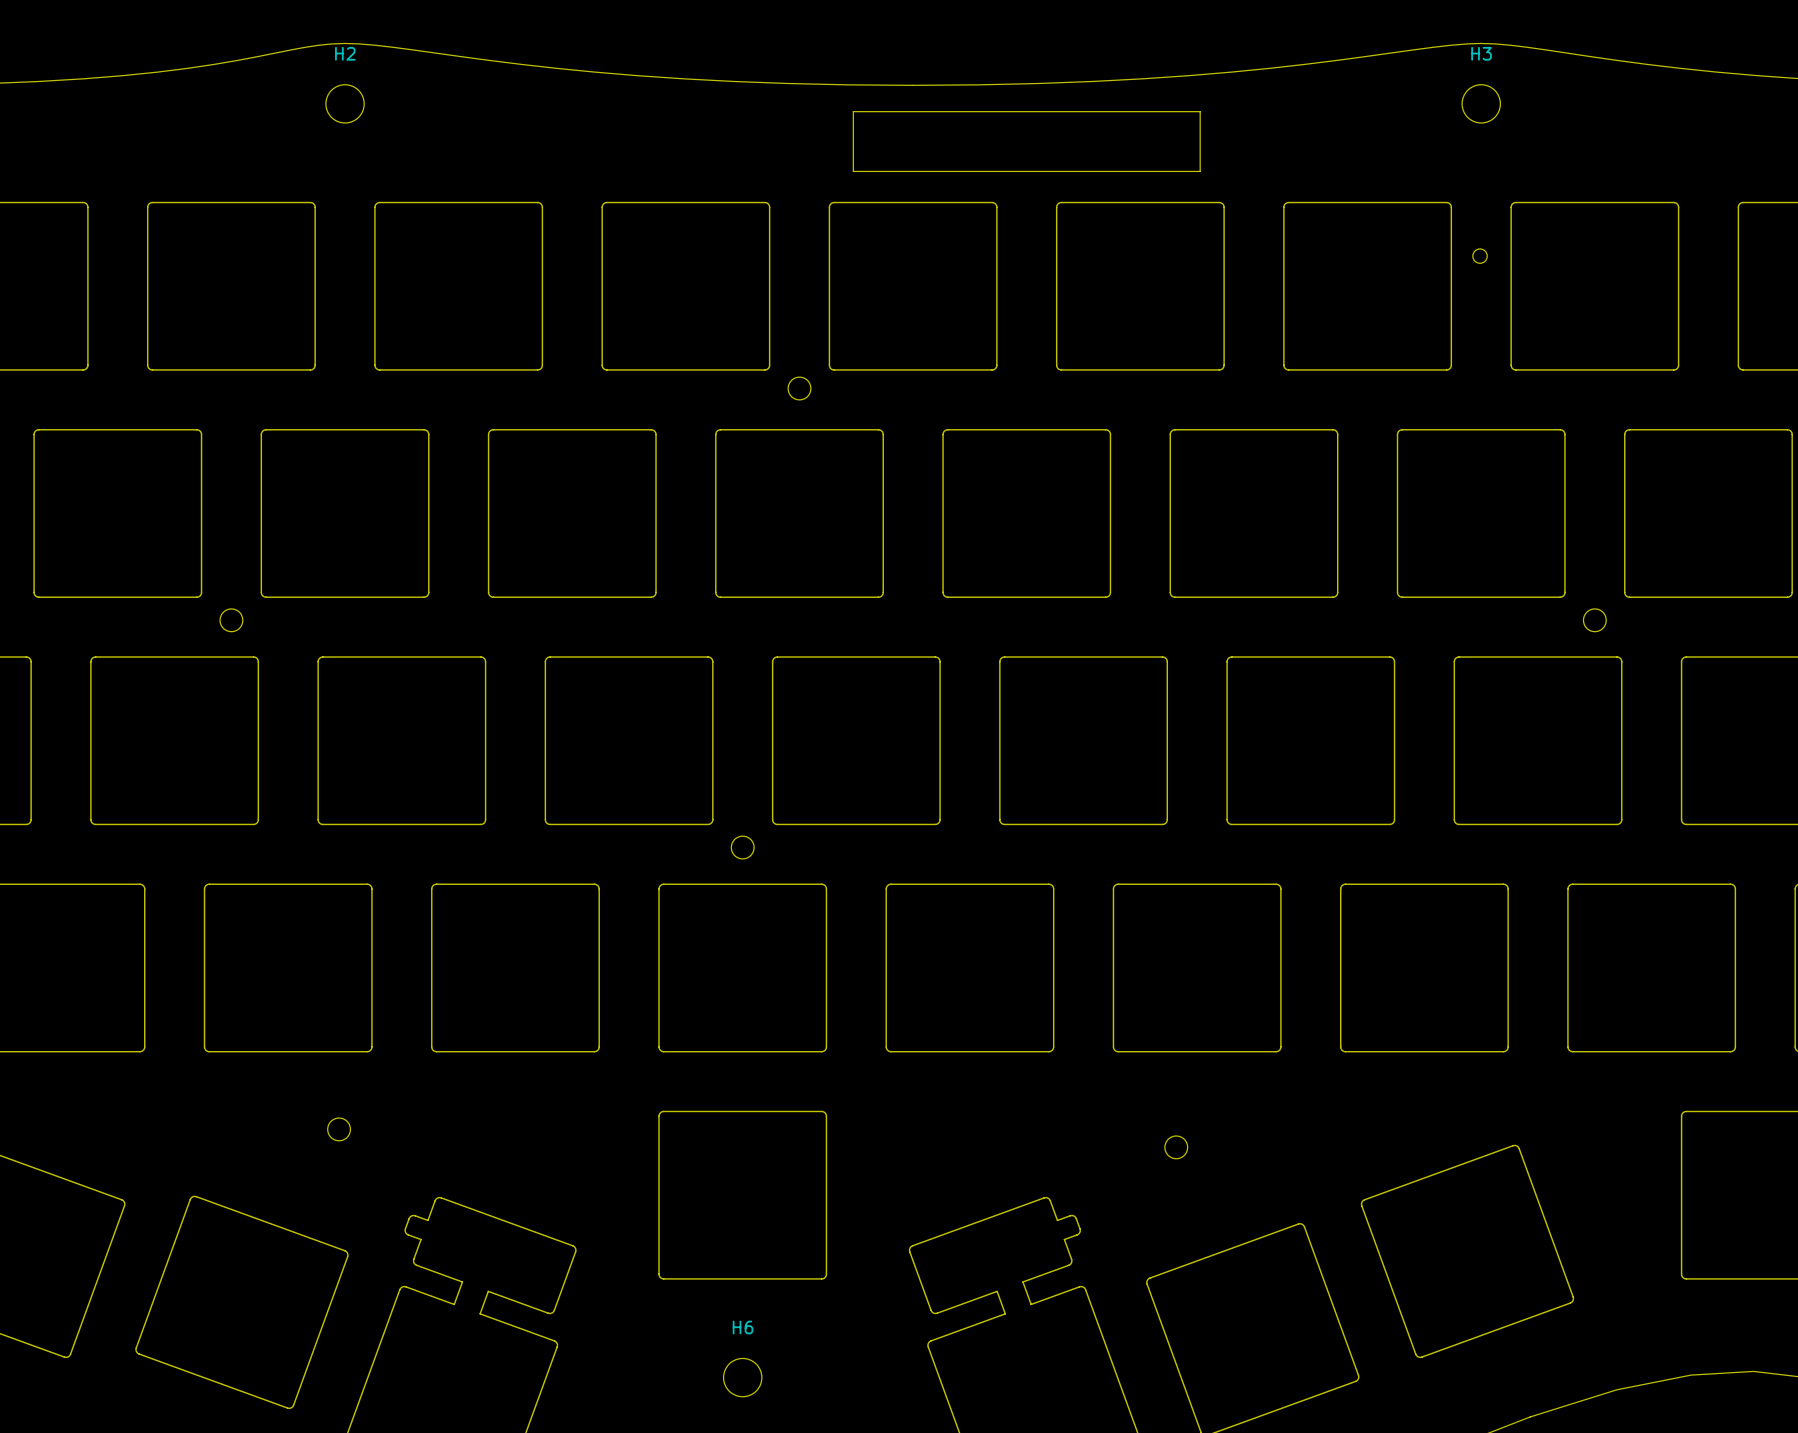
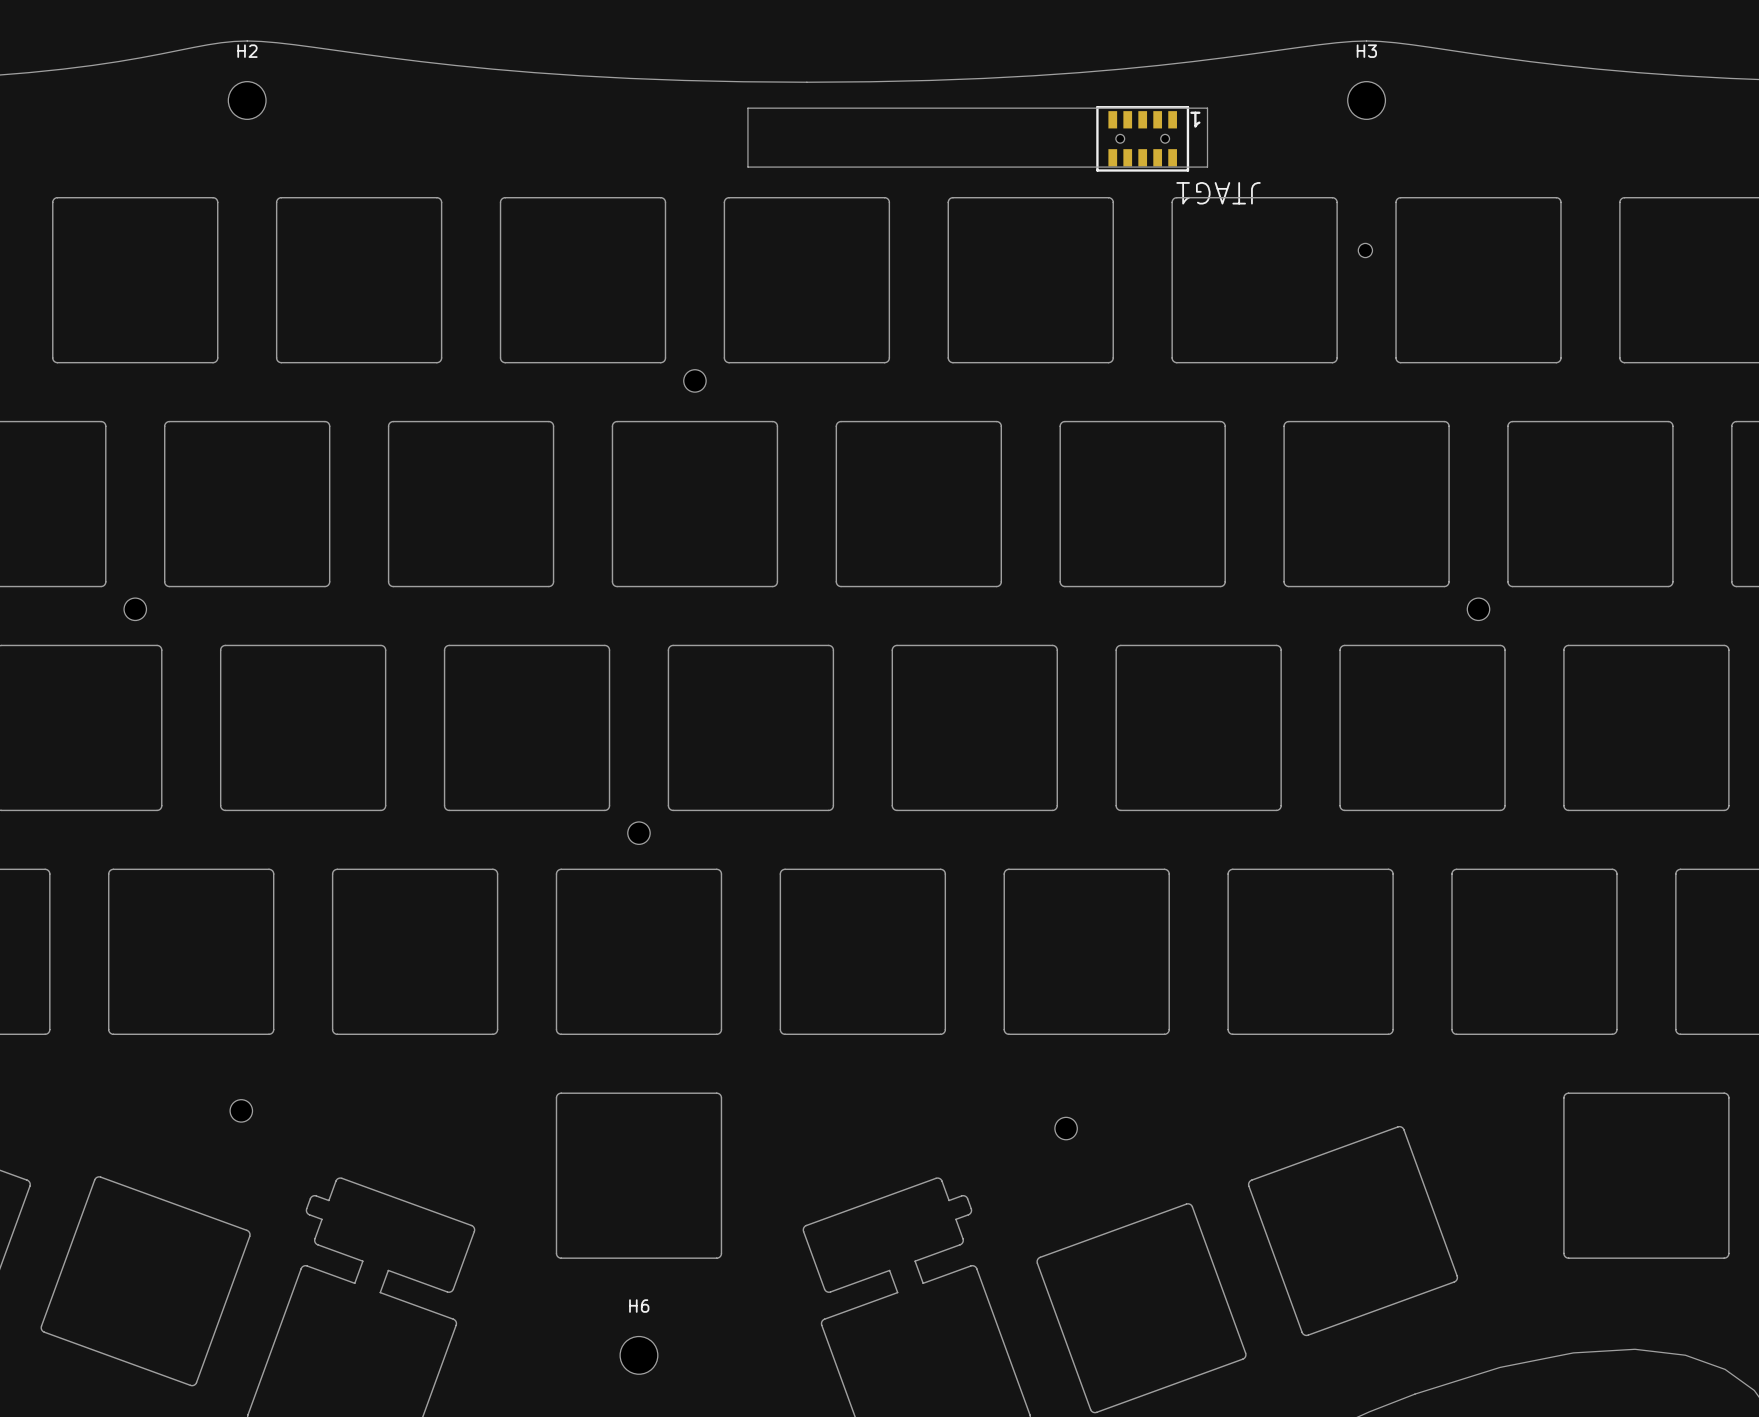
board edge: (1200, 111) (1200, 171) -> (1089, 108) (1207, 108) (1207, 167) (1089, 167)
JTAG1: none -> (1142, 138)

